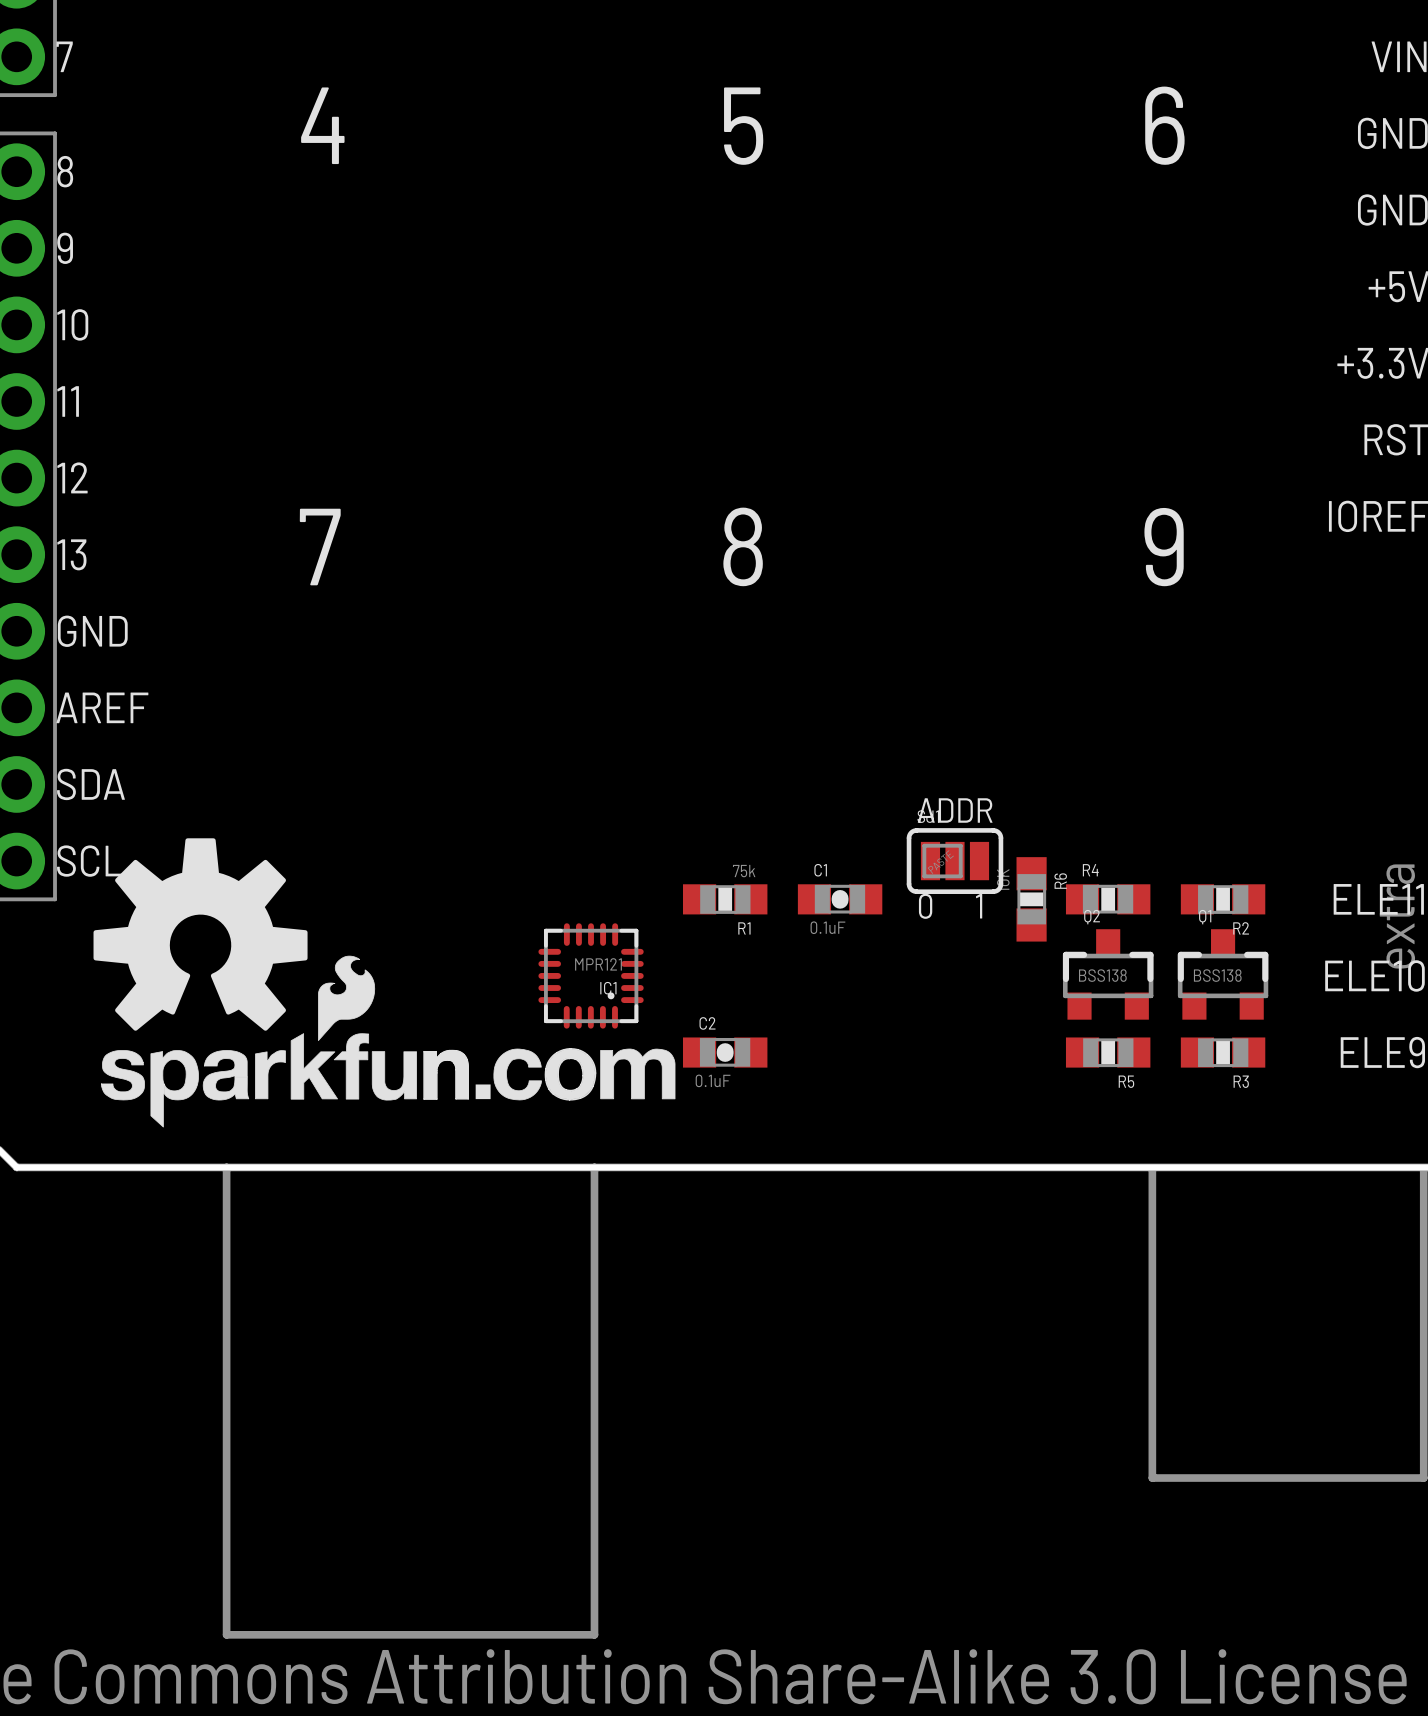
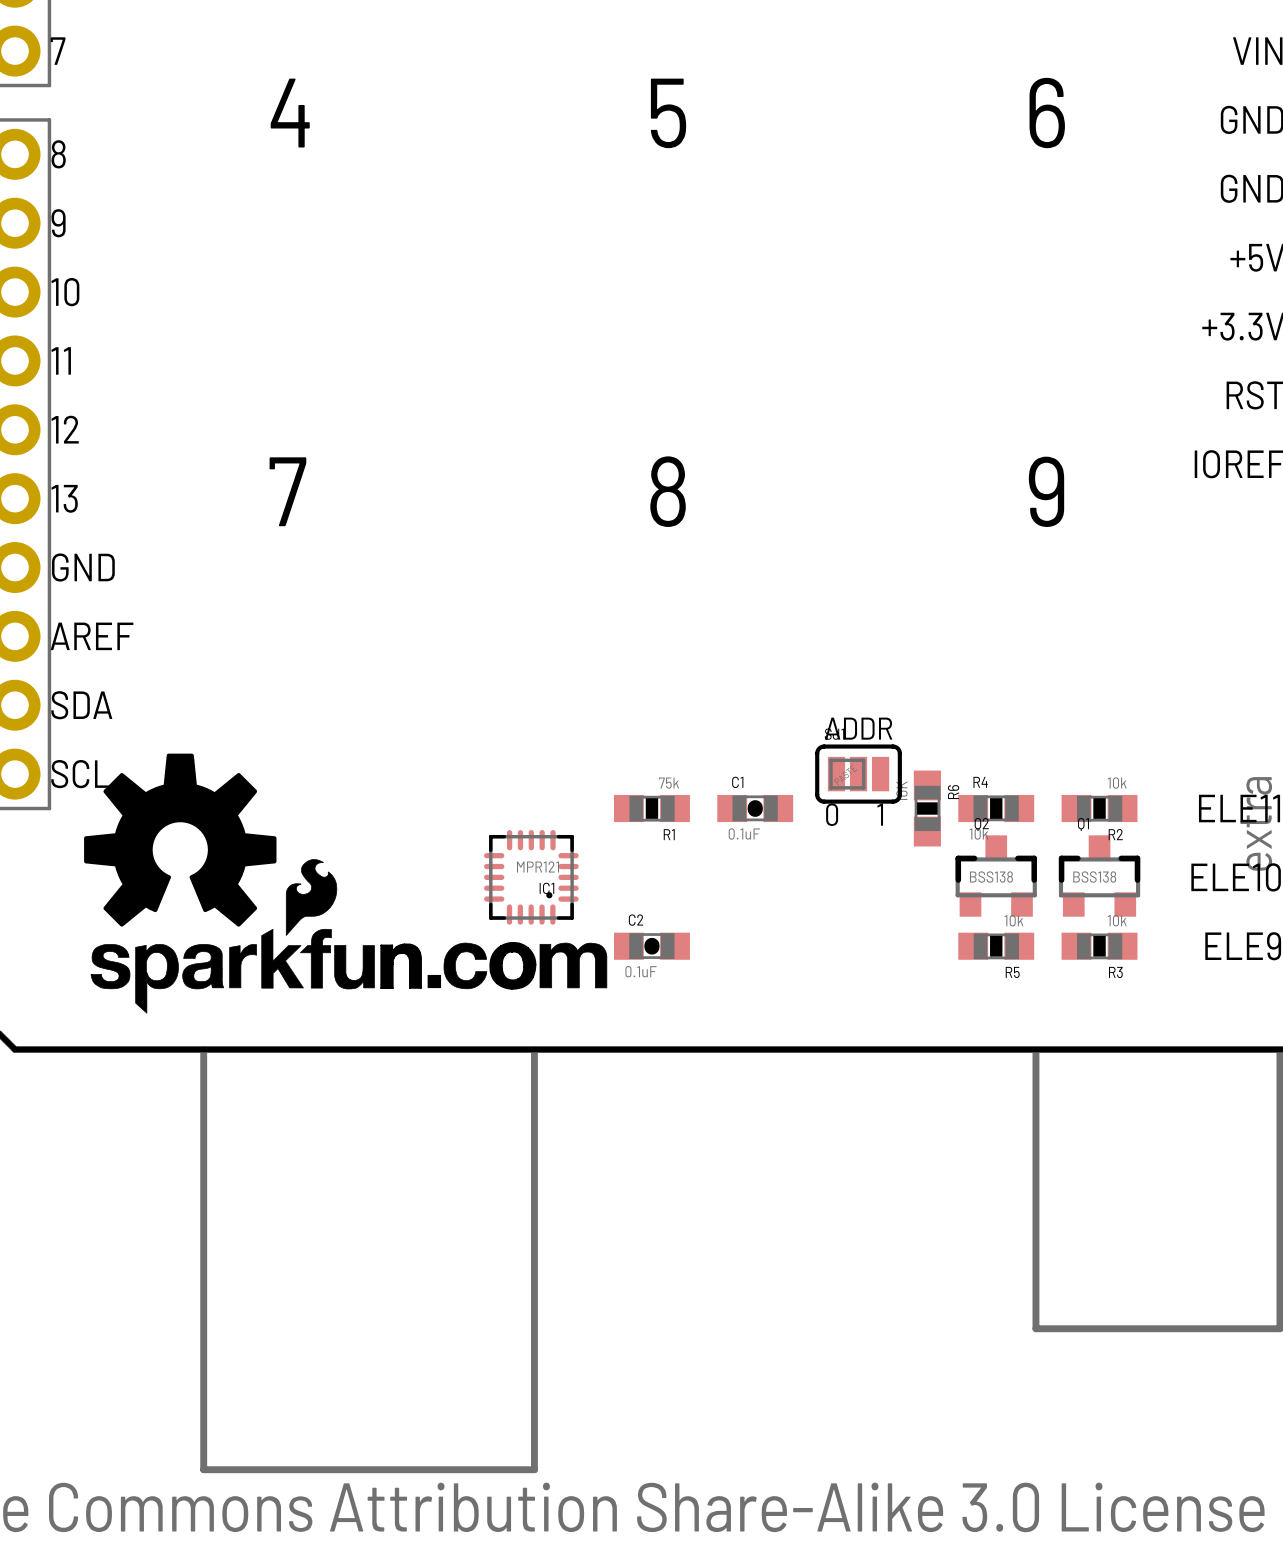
R2 value: none -> 10k (1117, 783)
R4 value: none -> 10k (978, 834)
R5 value: none -> 10k (1013, 920)
R3 value: none -> 10k (1117, 920)

